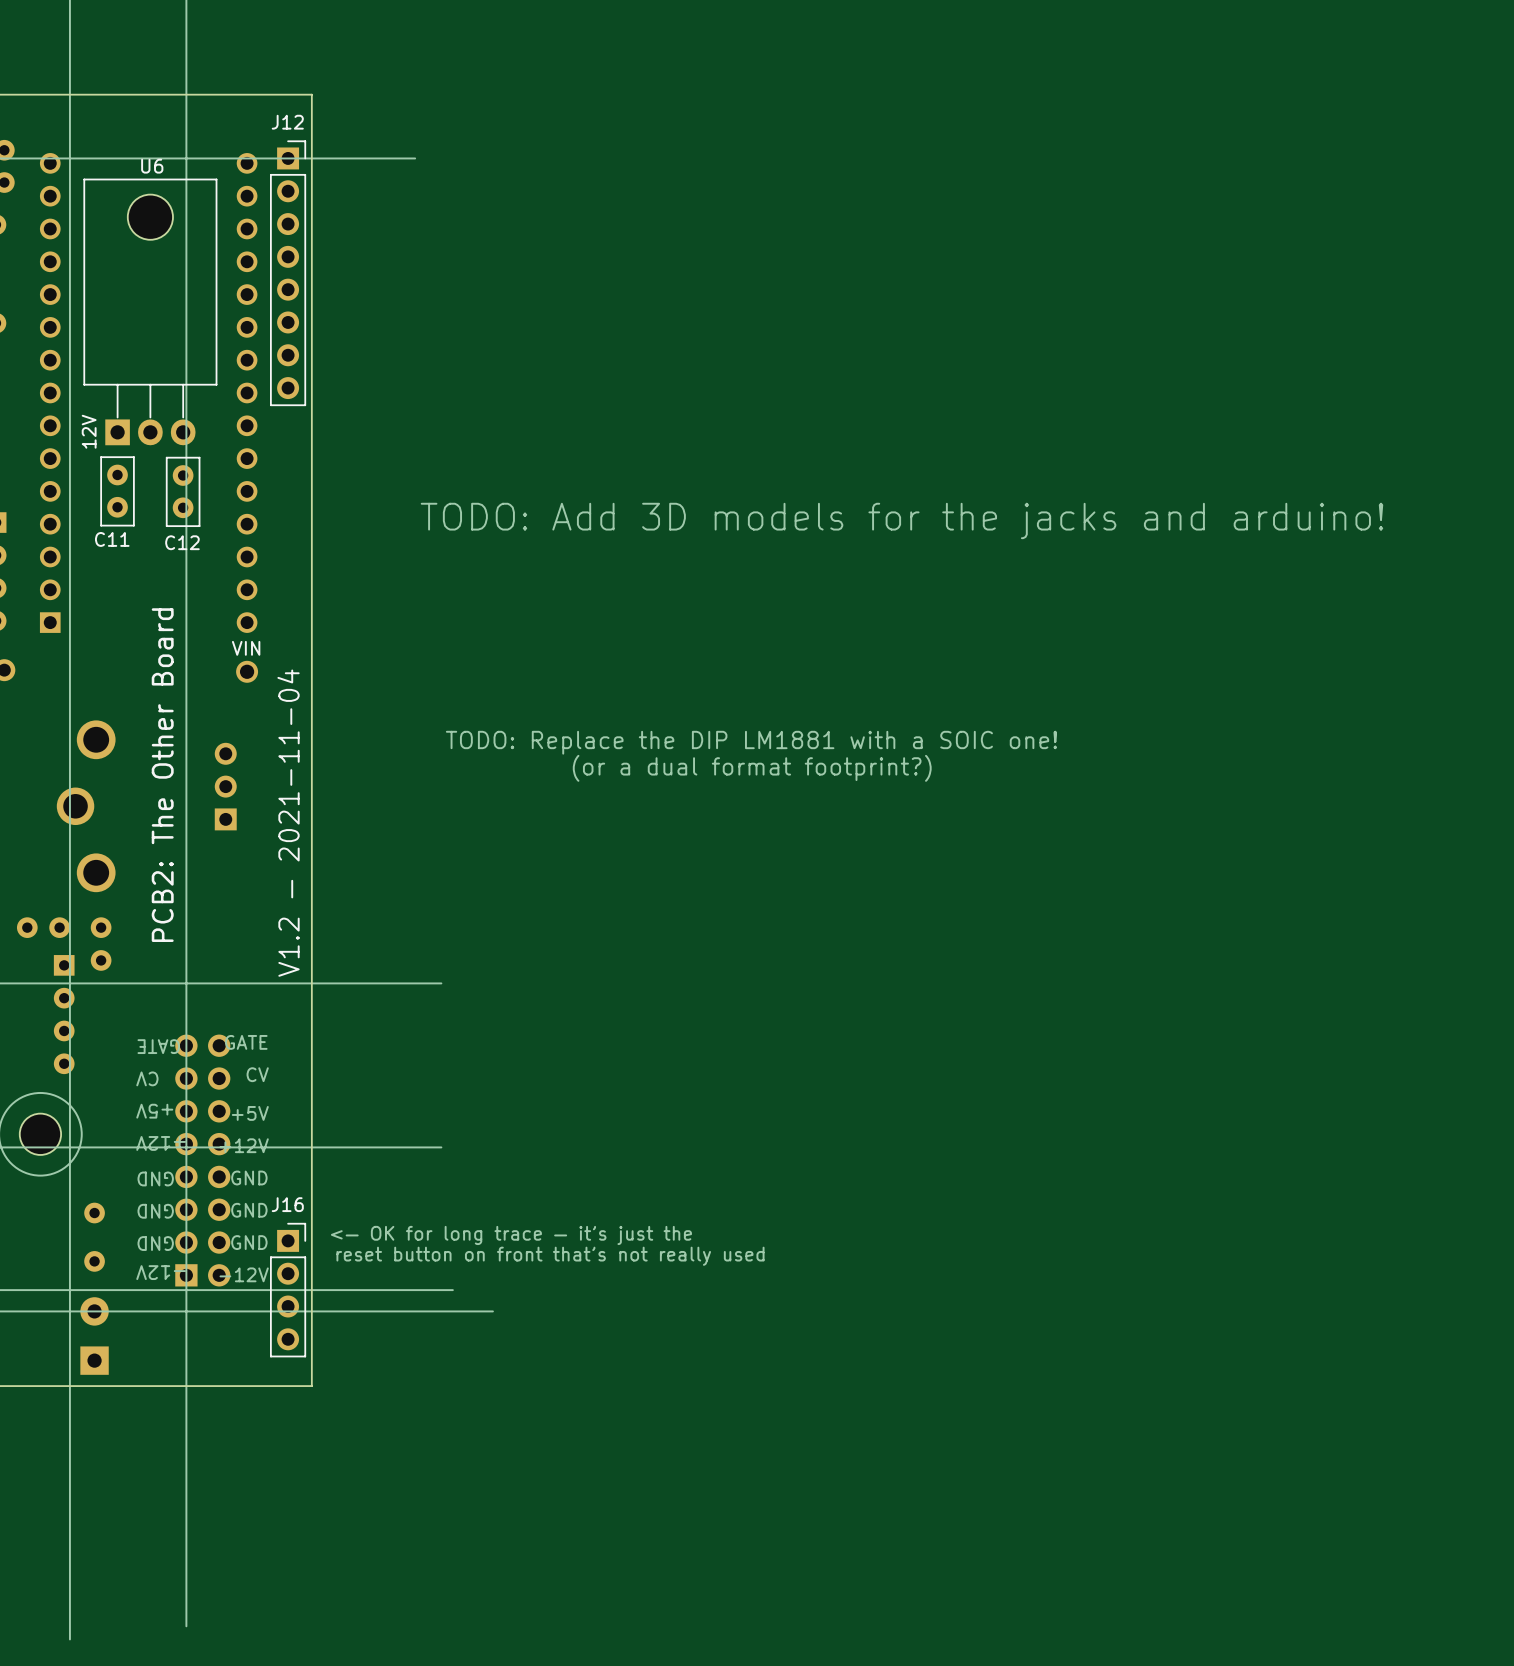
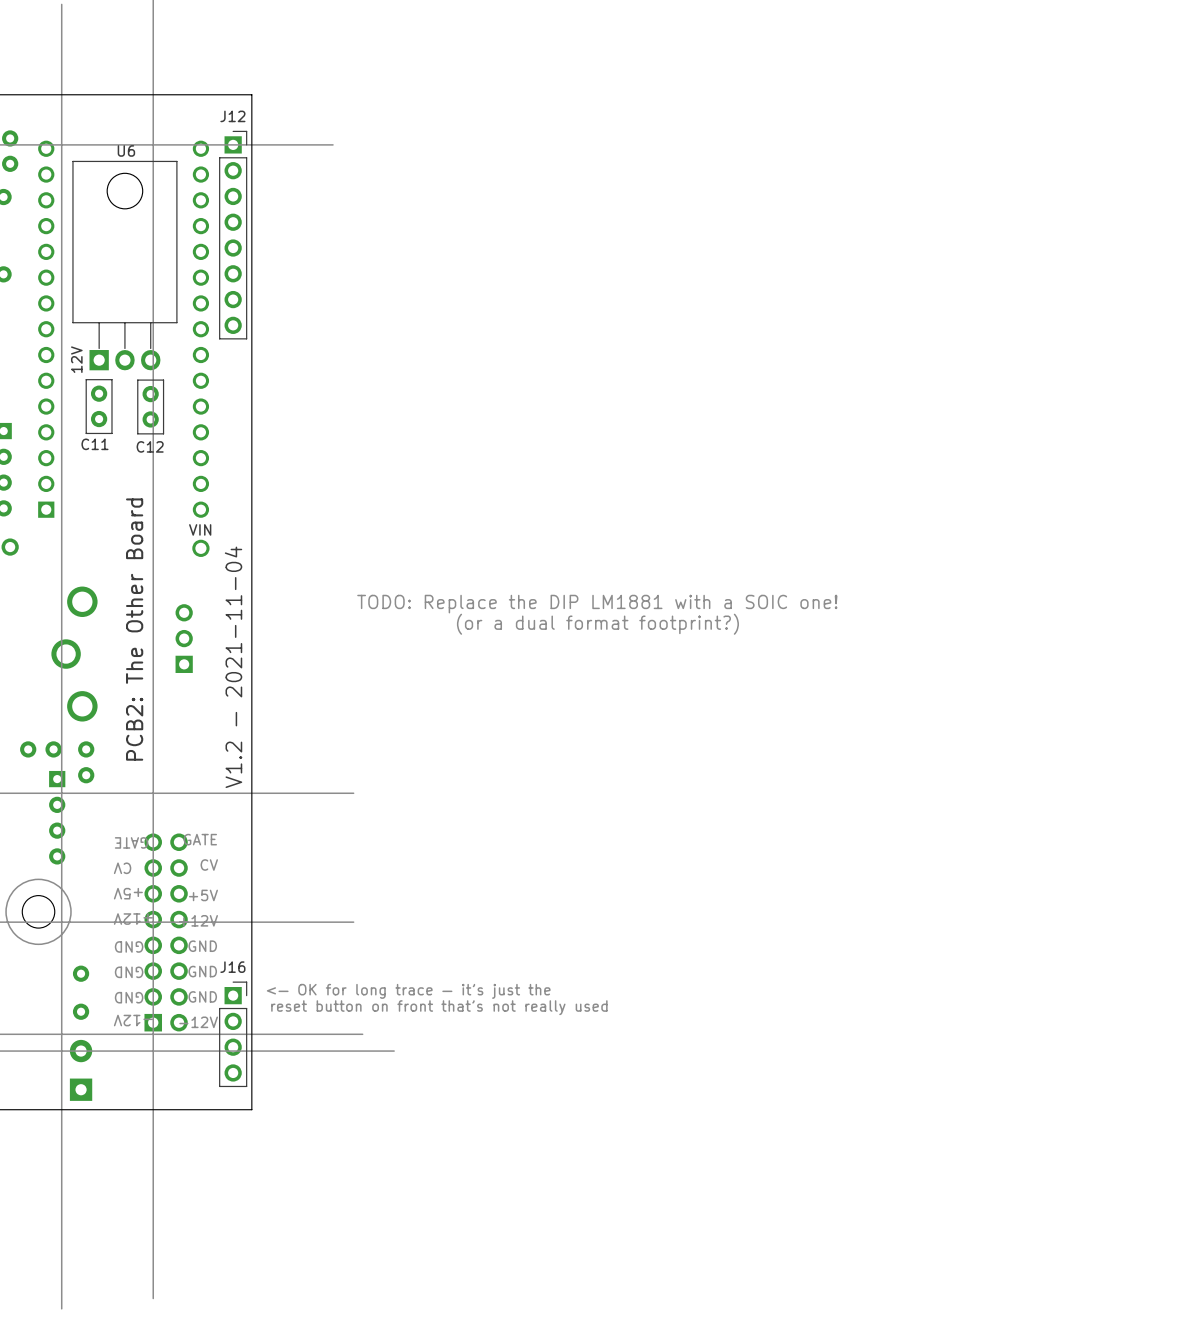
text: TODO: Add 3D models for the jacks and arduino! (901, 520) -> none

